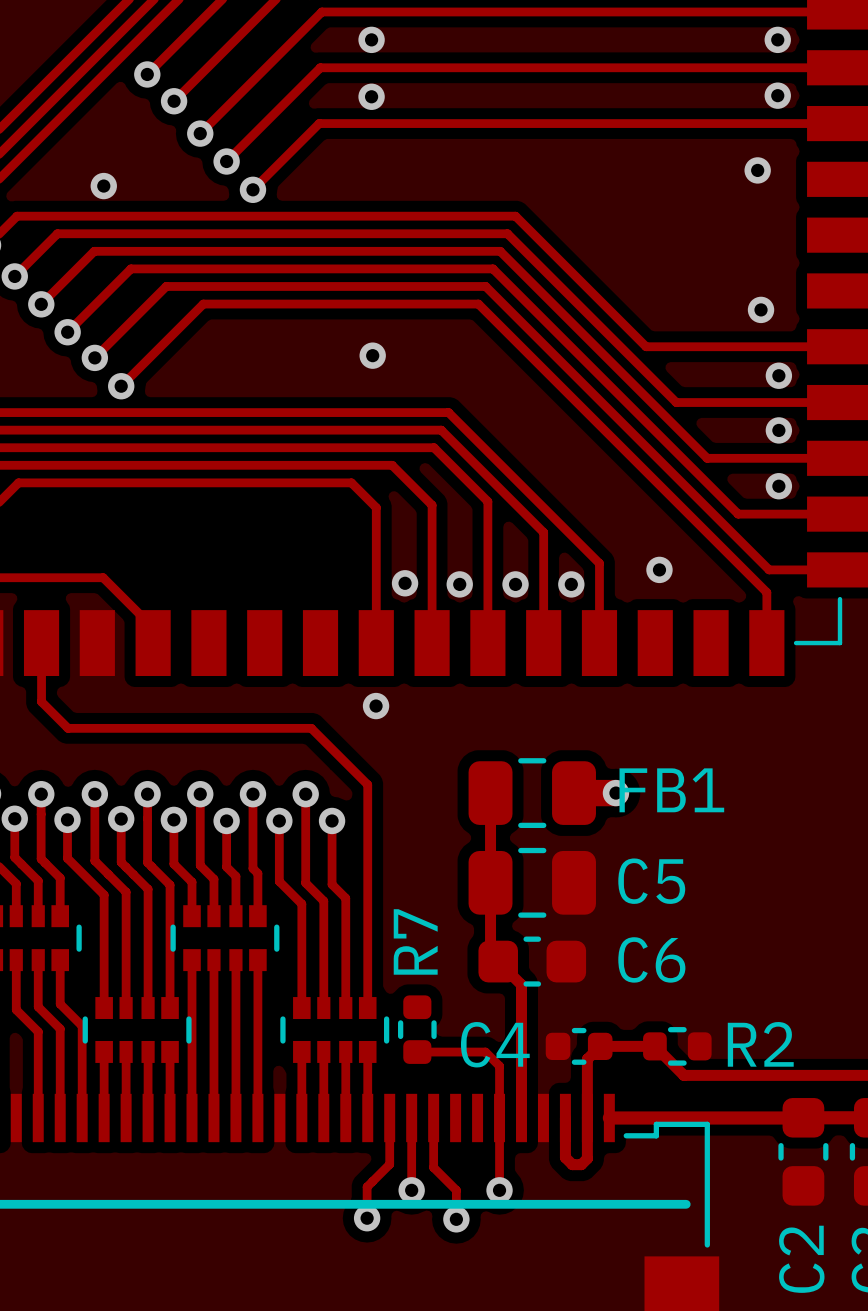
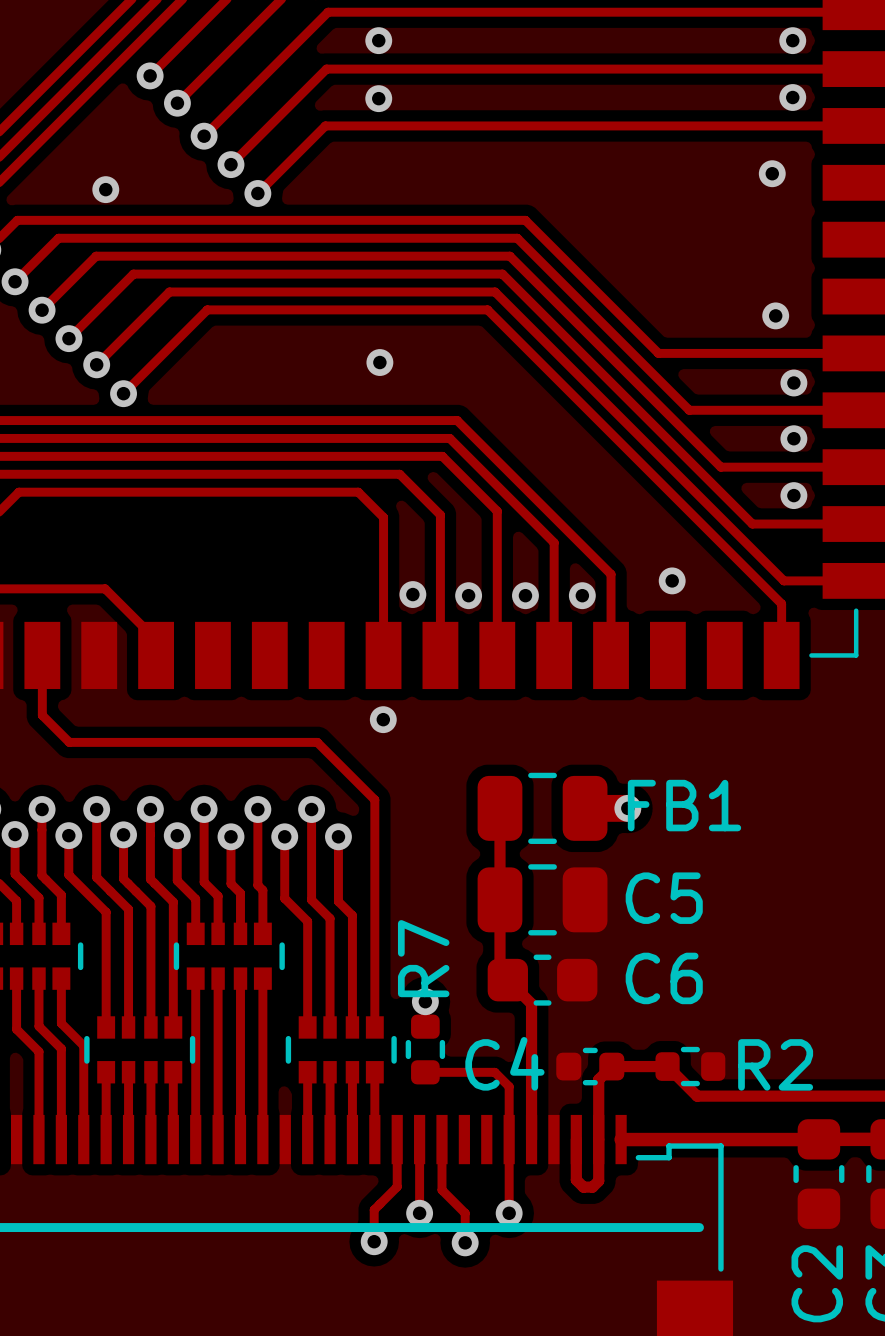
via: none -> (425, 1001)

